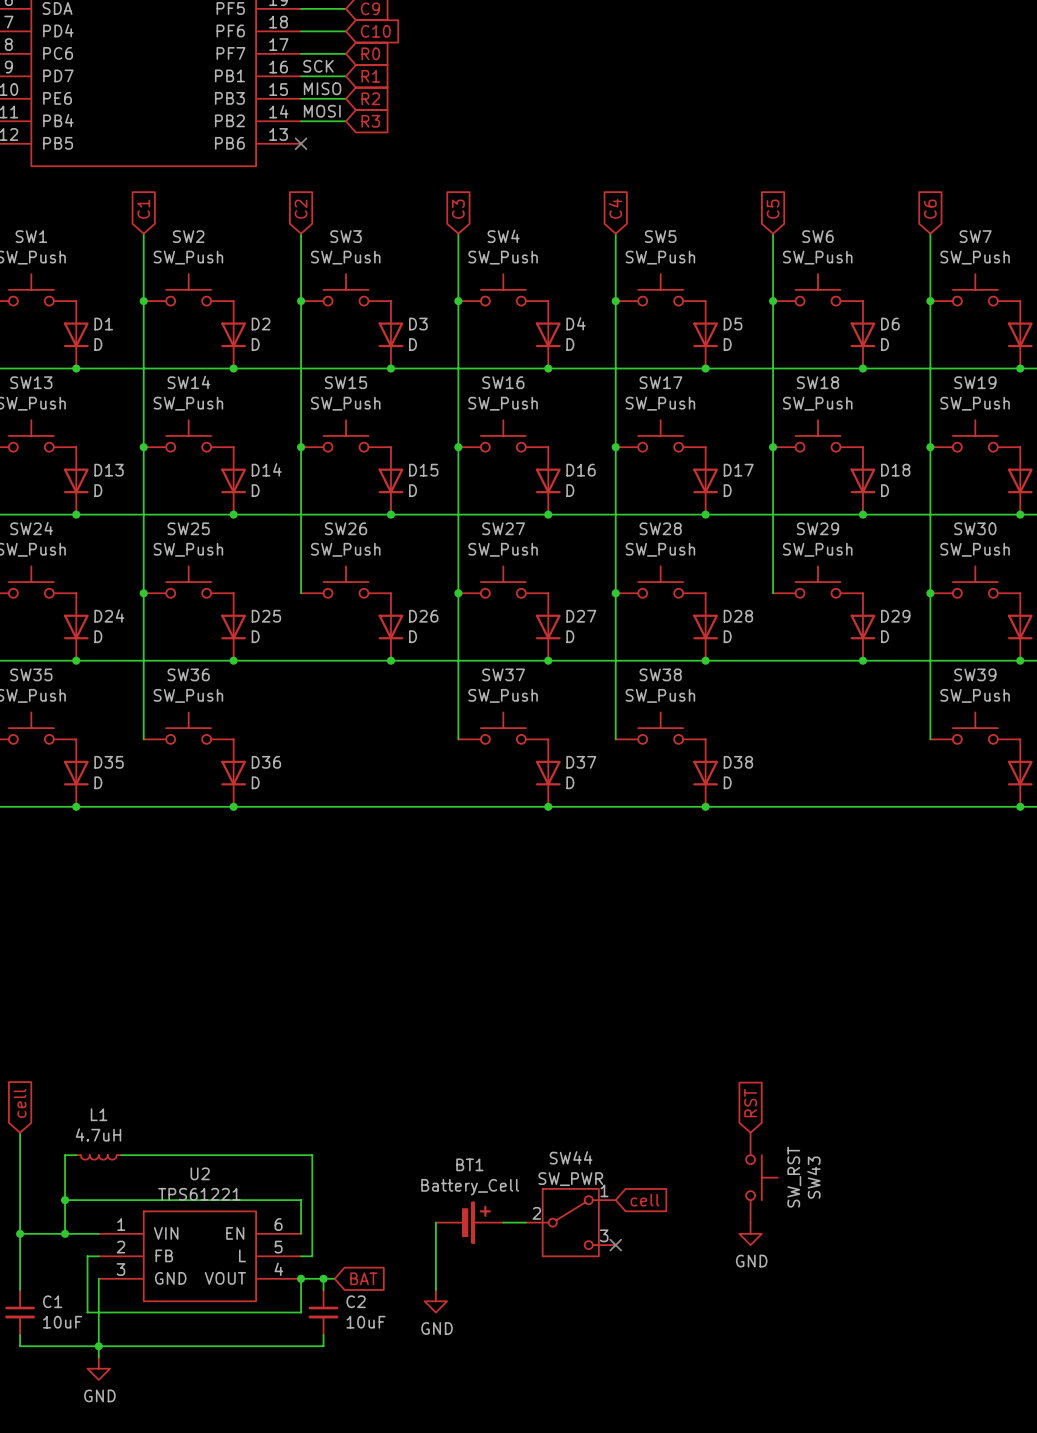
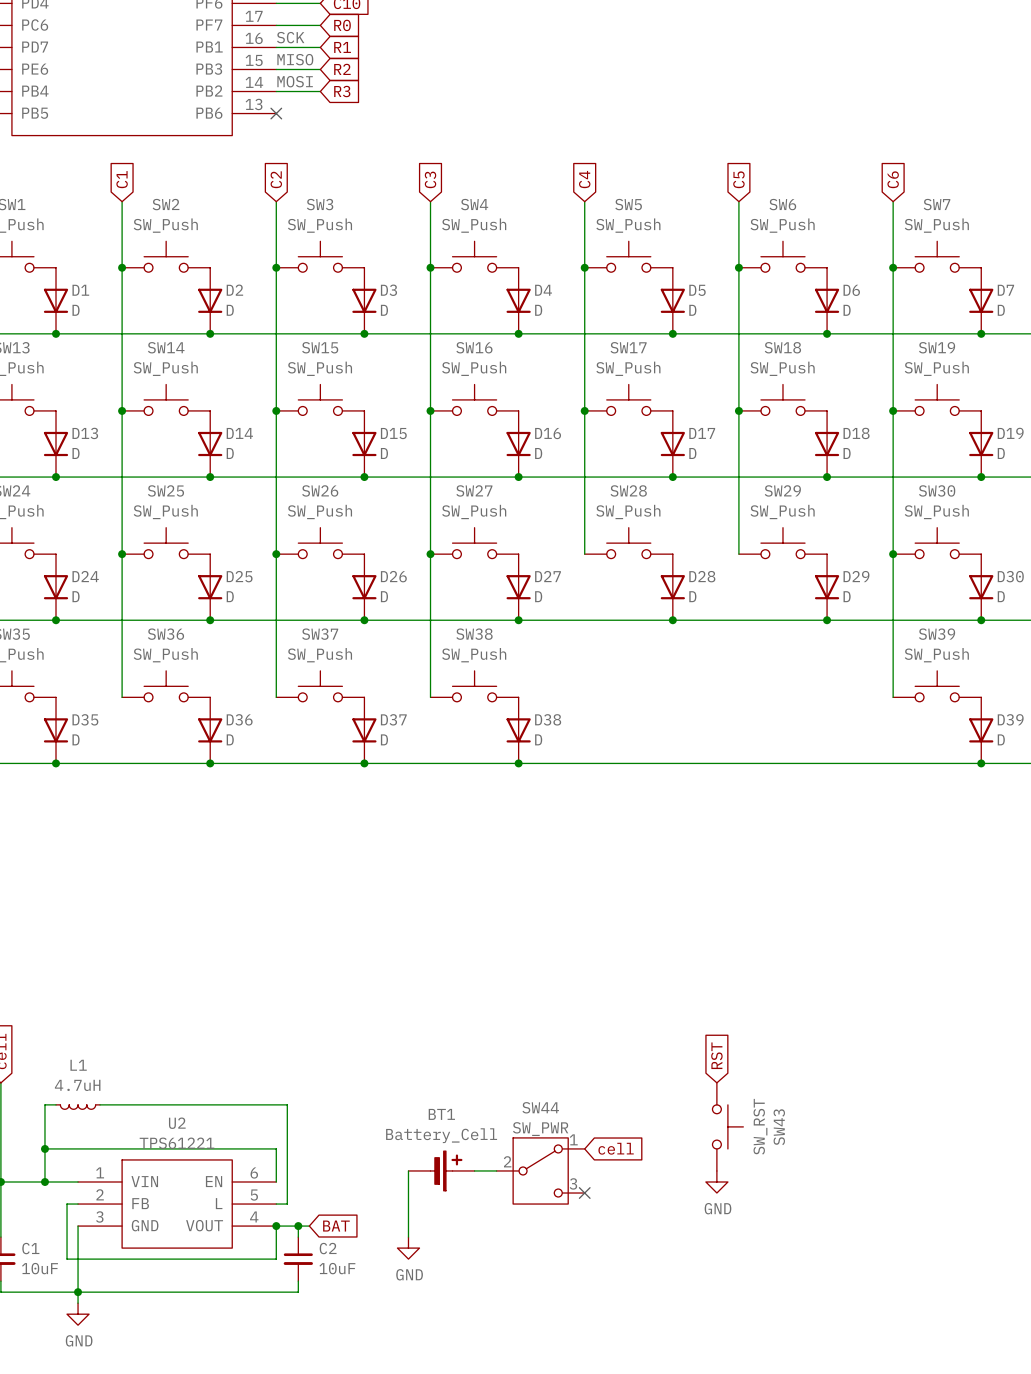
wire: none -> (276, 554) (276, 697)
junction: none -> (276, 554)
wire: (615, 593) (615, 739) -> none
junction: (615, 593) -> none
SW37 name: SW37 (503, 674) -> SW38 (474, 634)
SW37: none -> SW_Push (320, 686)
SW38: SW_Push (660, 728) -> none
D37 name: D37 (581, 762) -> D38 (548, 719)
D37: none -> D (364, 730)
D38: D (705, 773) -> none
junction: none -> (364, 763)
junction: (705, 806) -> none

